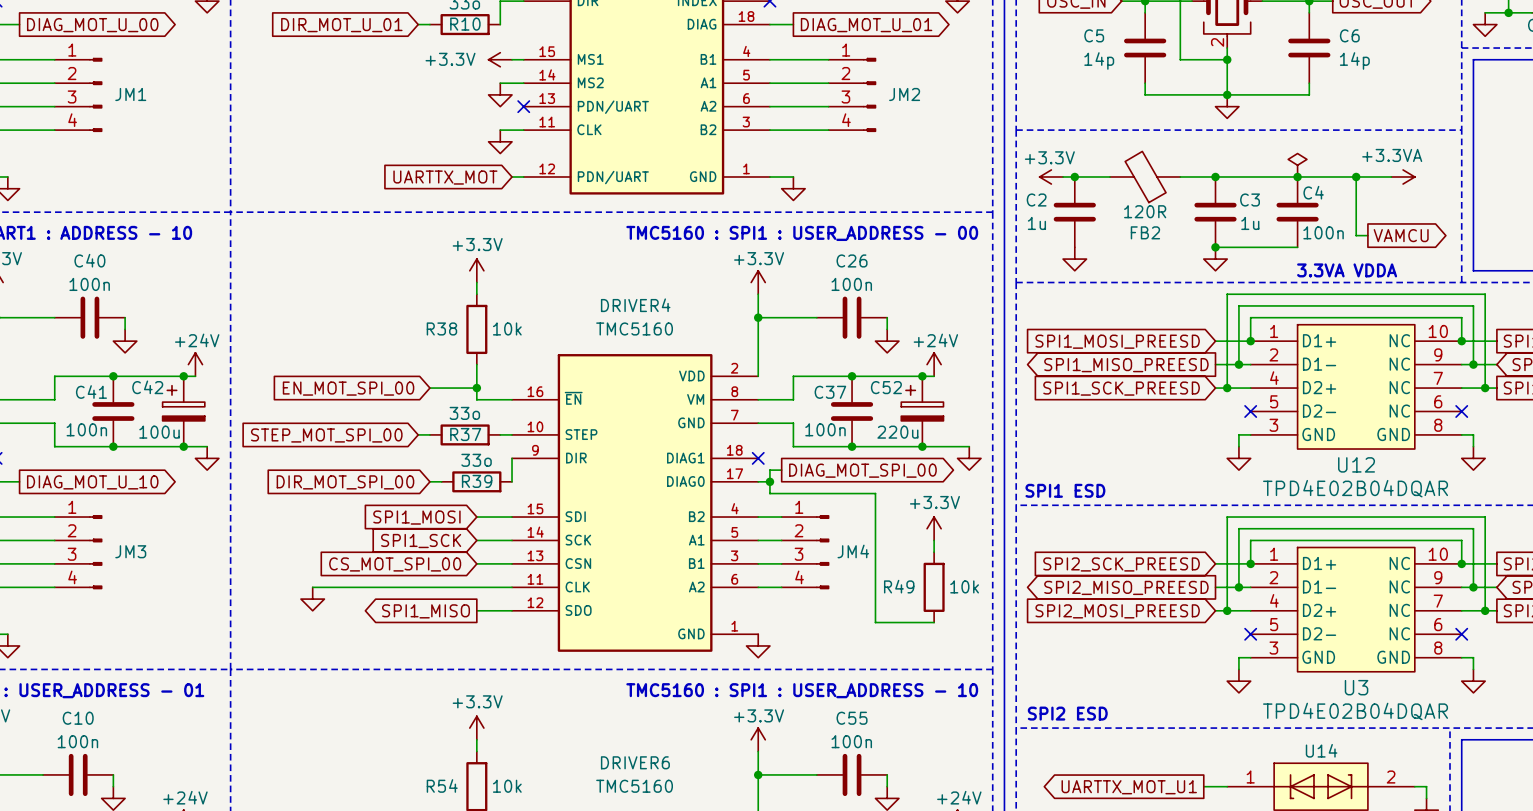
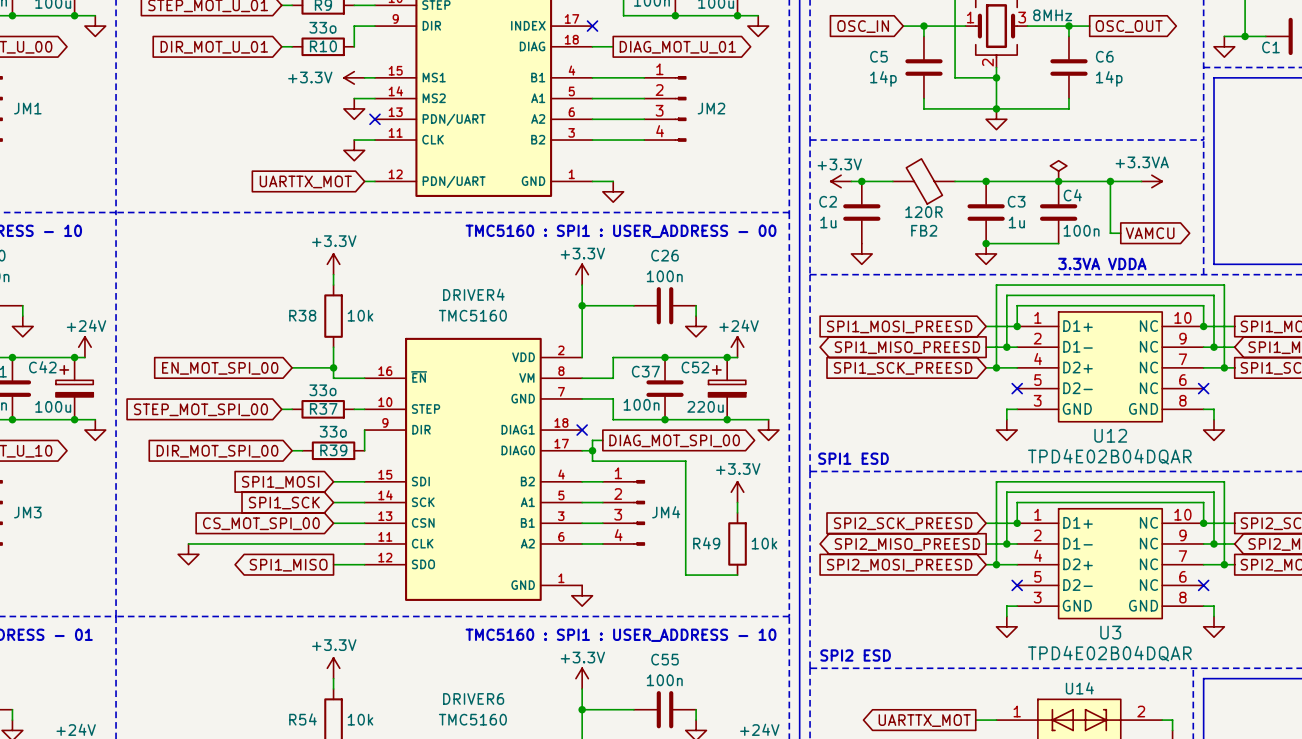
global label: UARTTX_MOT_U1 (1129, 787) -> UARTTX_MOT (924, 720)

